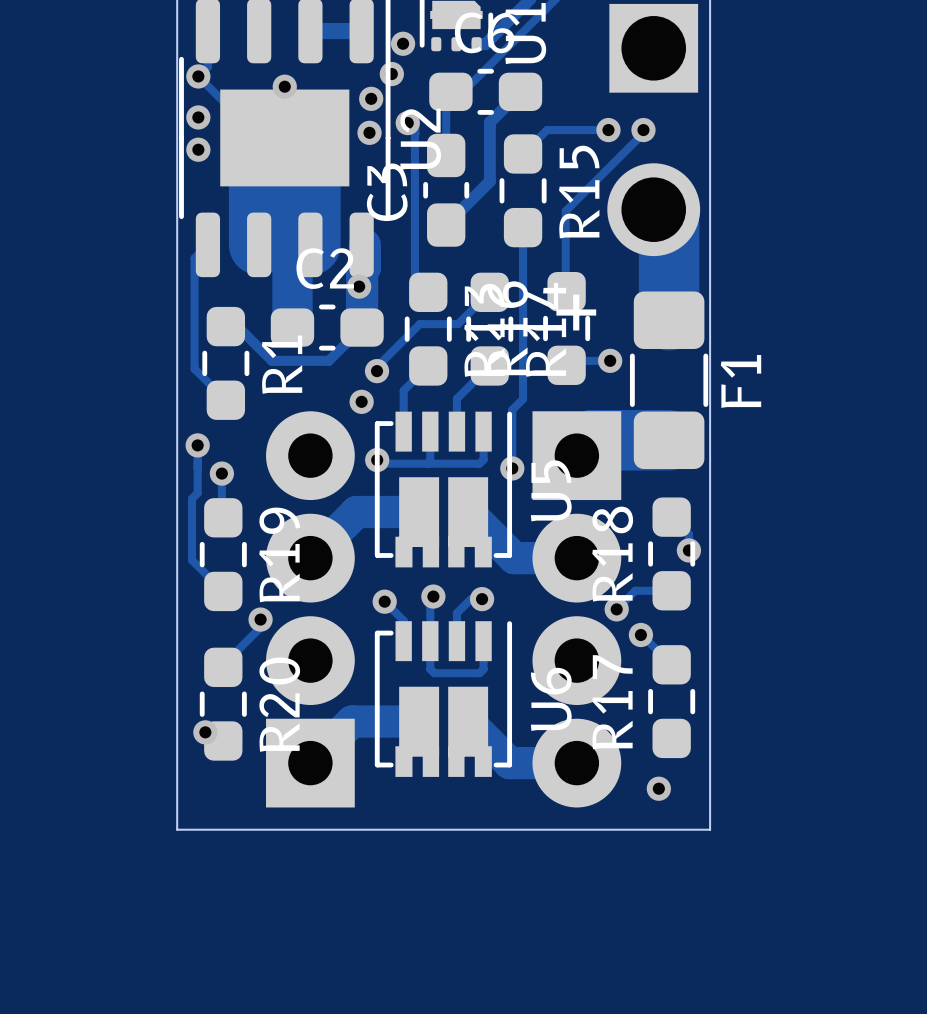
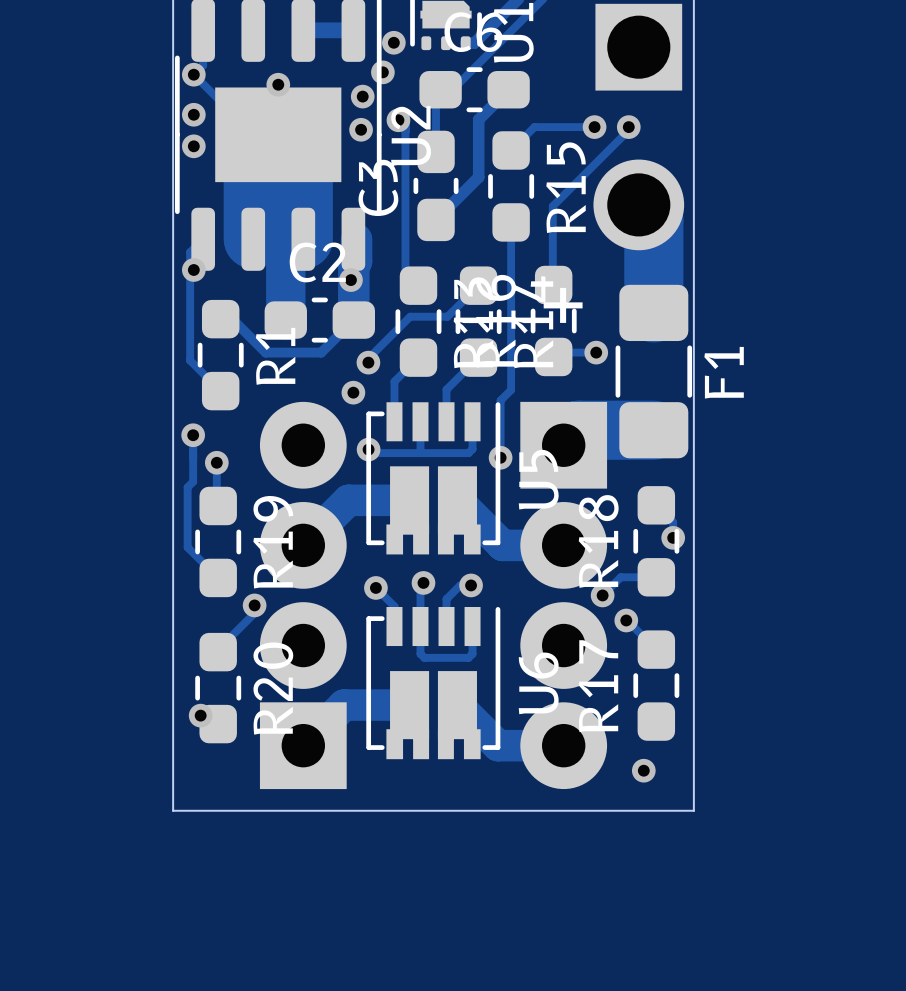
via: none -> (193, 269)

